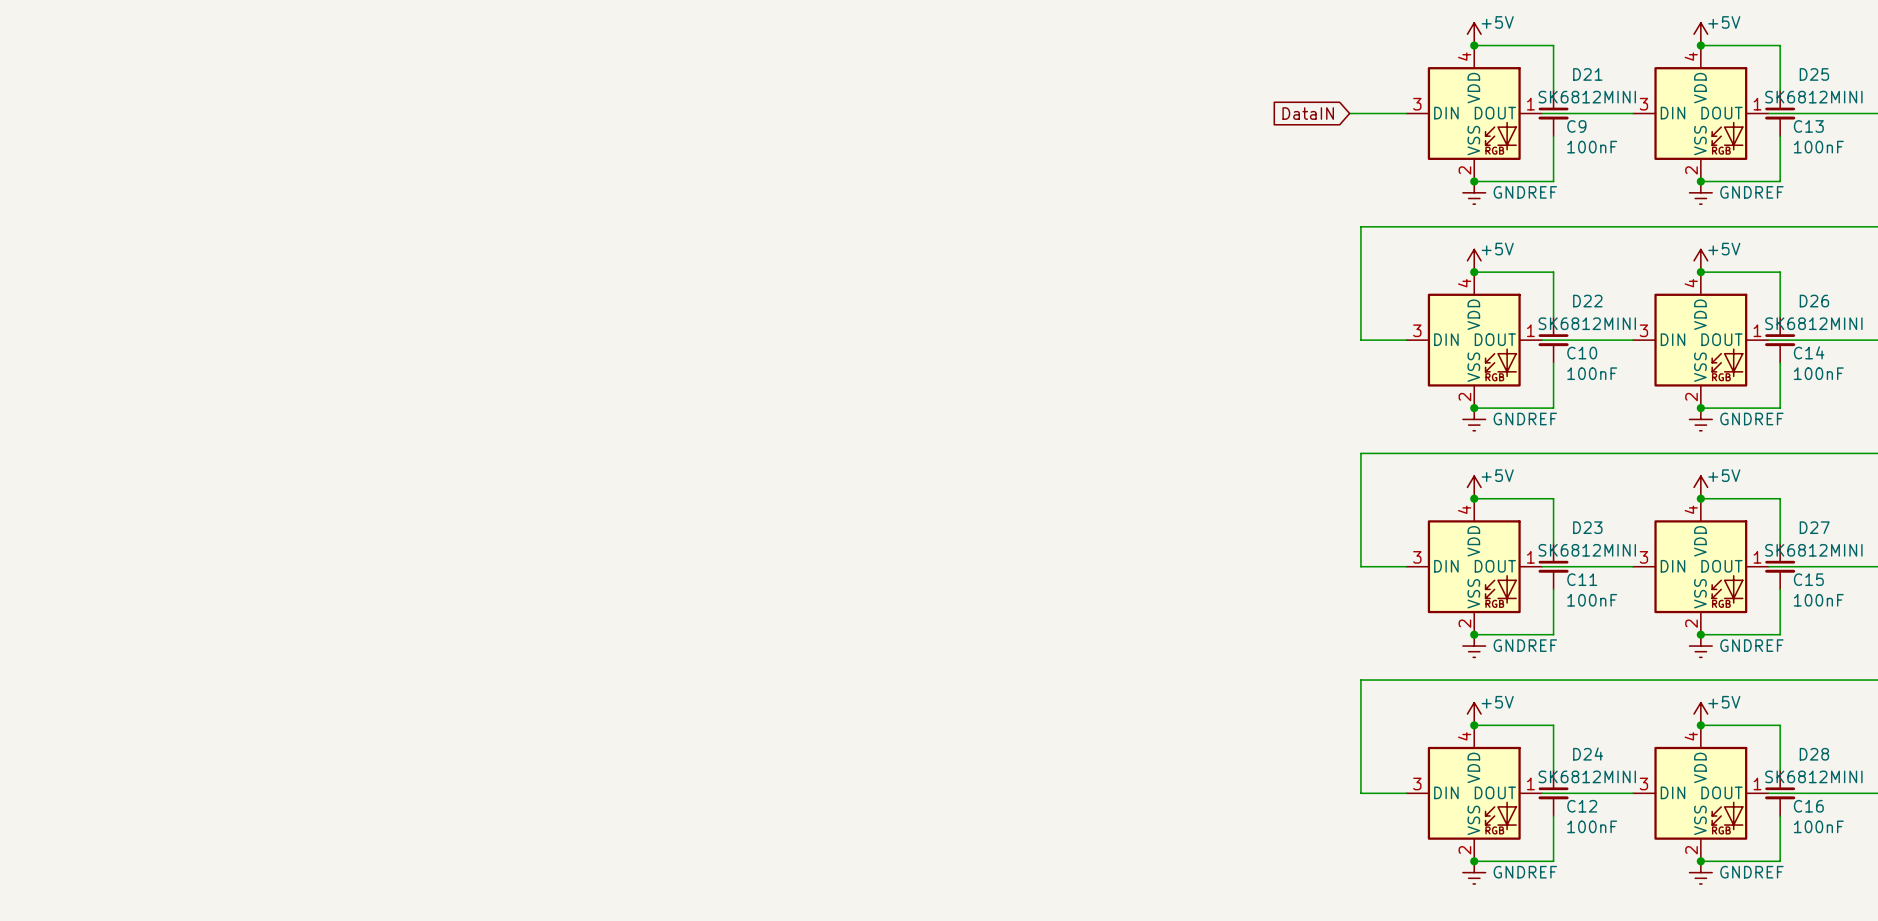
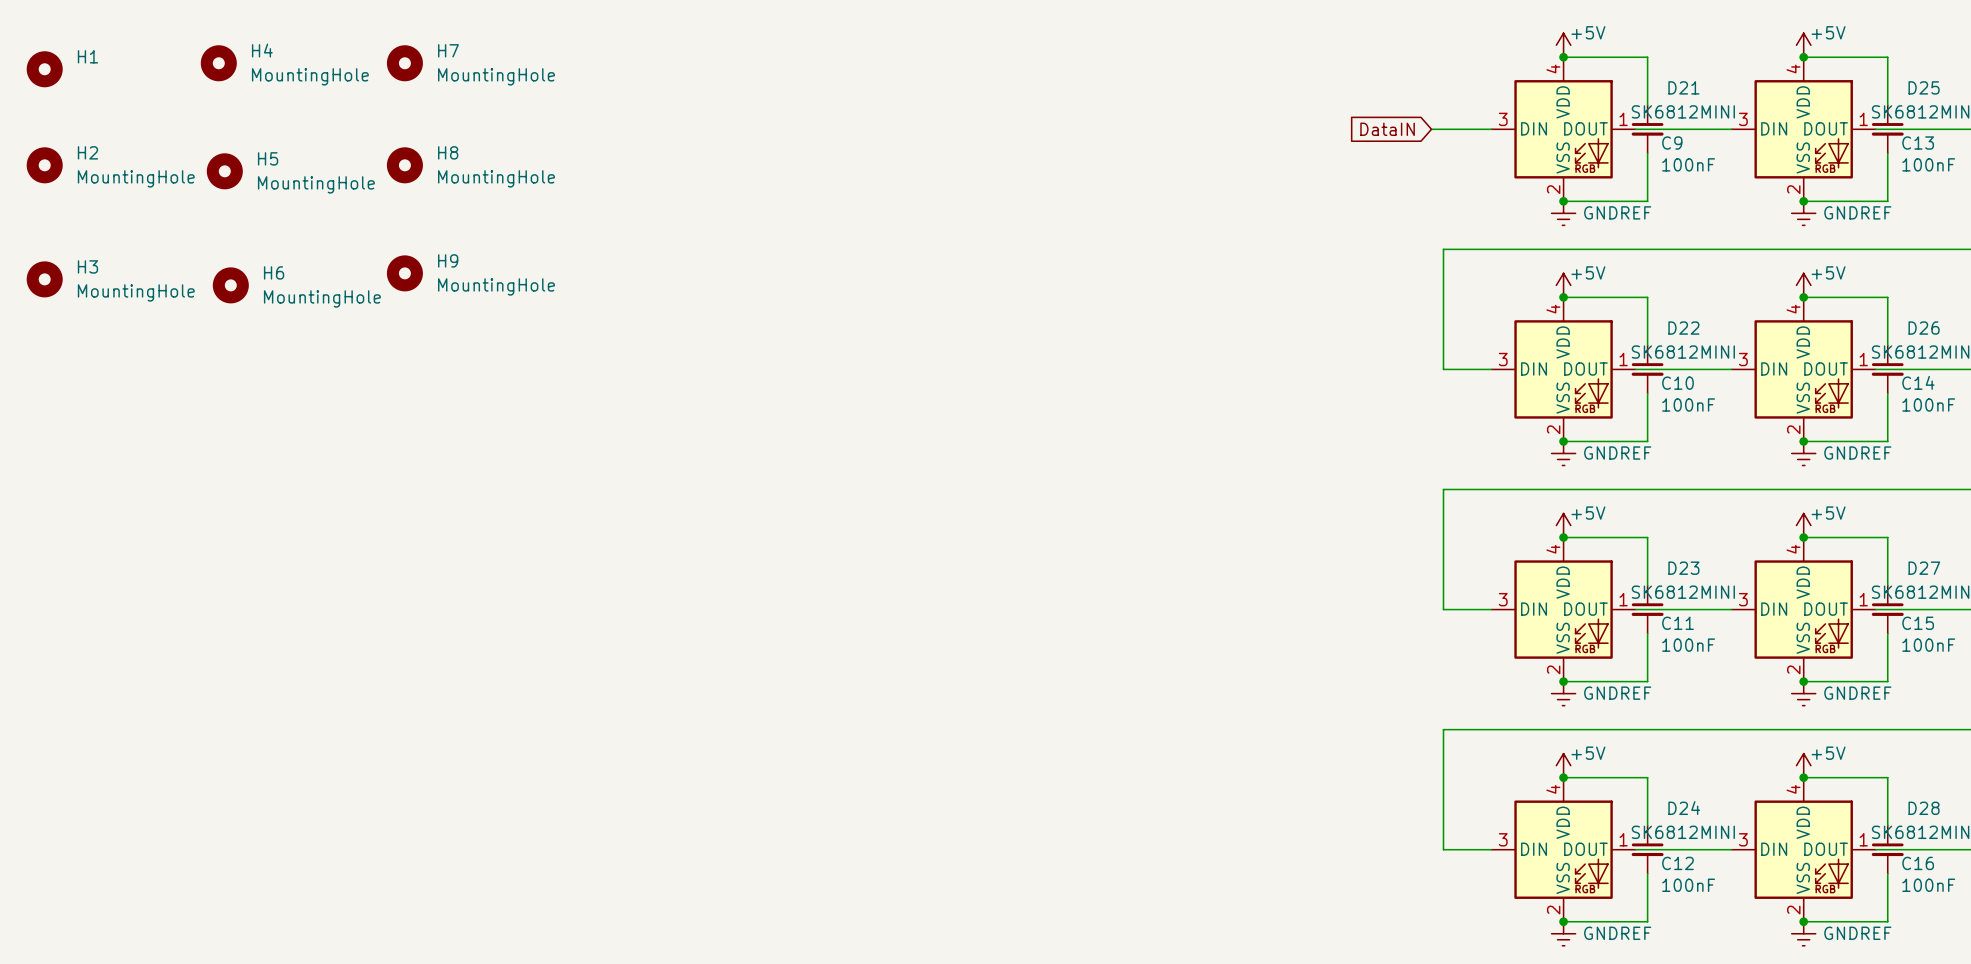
H4: none -> MountingHole (218, 63)
H7: none -> MountingHole (404, 63)
H1: none -> (44, 69)
H2: none -> MountingHole (44, 165)
H8: none -> MountingHole (404, 165)
H5: none -> MountingHole (224, 171)
H9: none -> MountingHole (404, 273)
H3: none -> MountingHole (44, 279)
H6: none -> MountingHole (230, 285)

